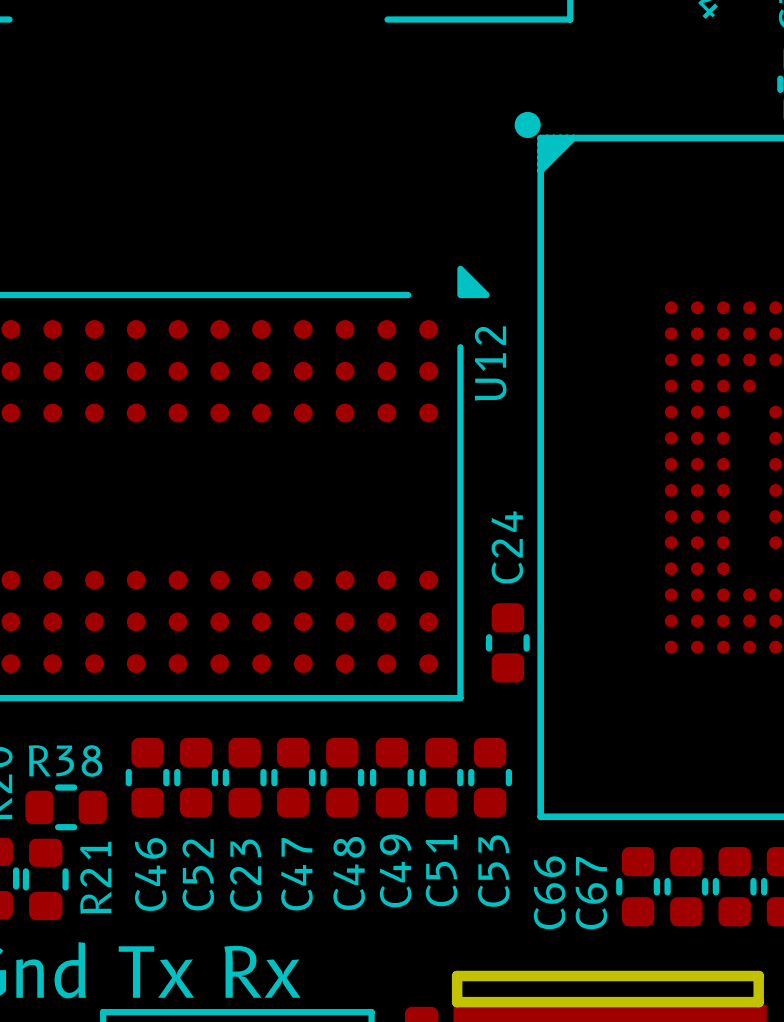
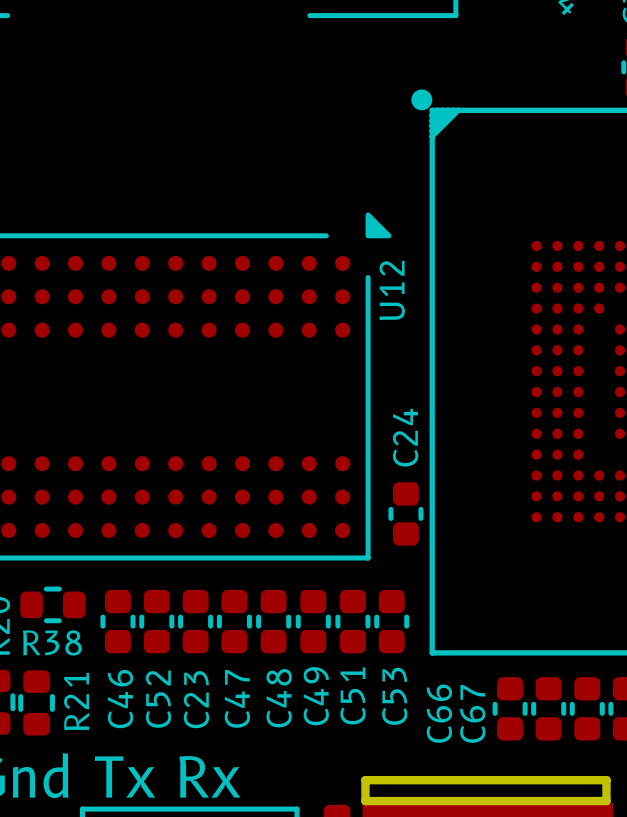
R38 name position: R38 (65, 760) -> R38 (52, 642)
R38 position: (66, 807) -> (52, 604)

